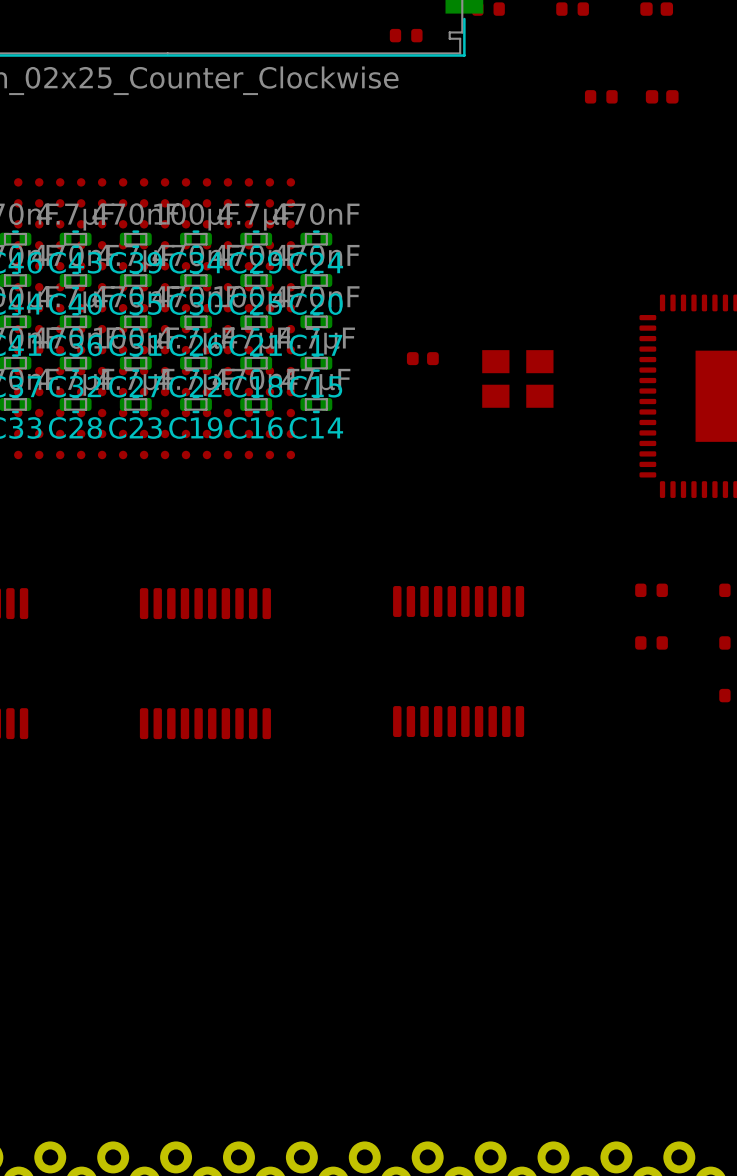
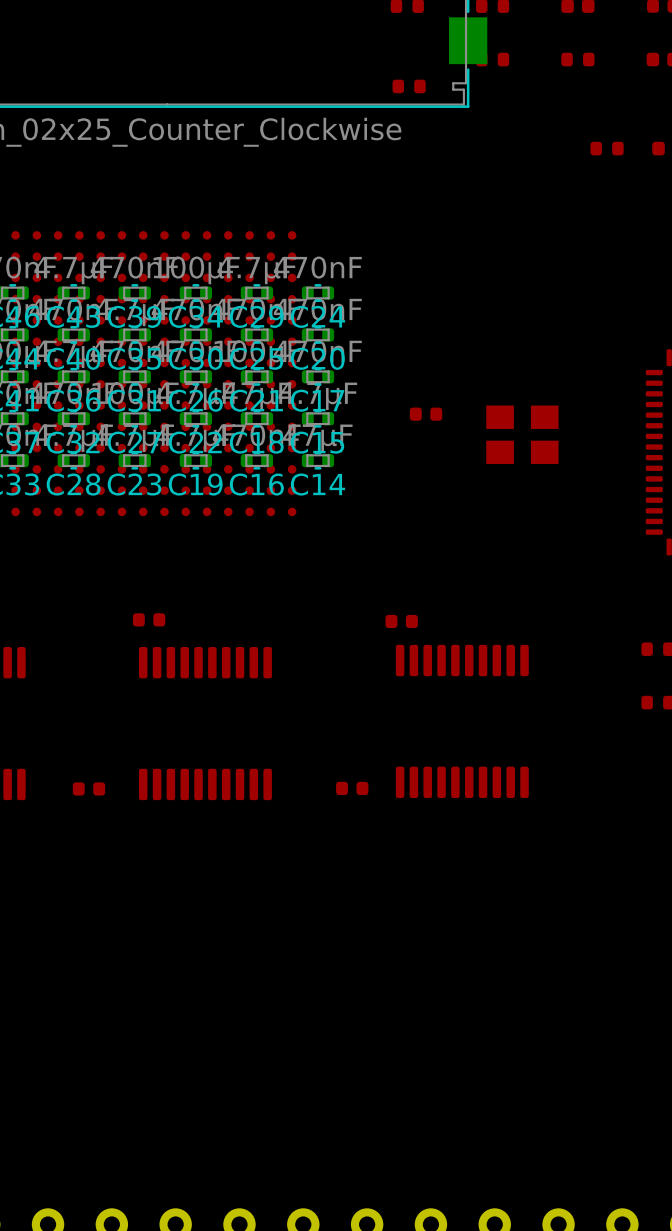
part: none -> (149, 619)
part: none -> (401, 621)
part: none -> (352, 788)
part: none -> (88, 788)

